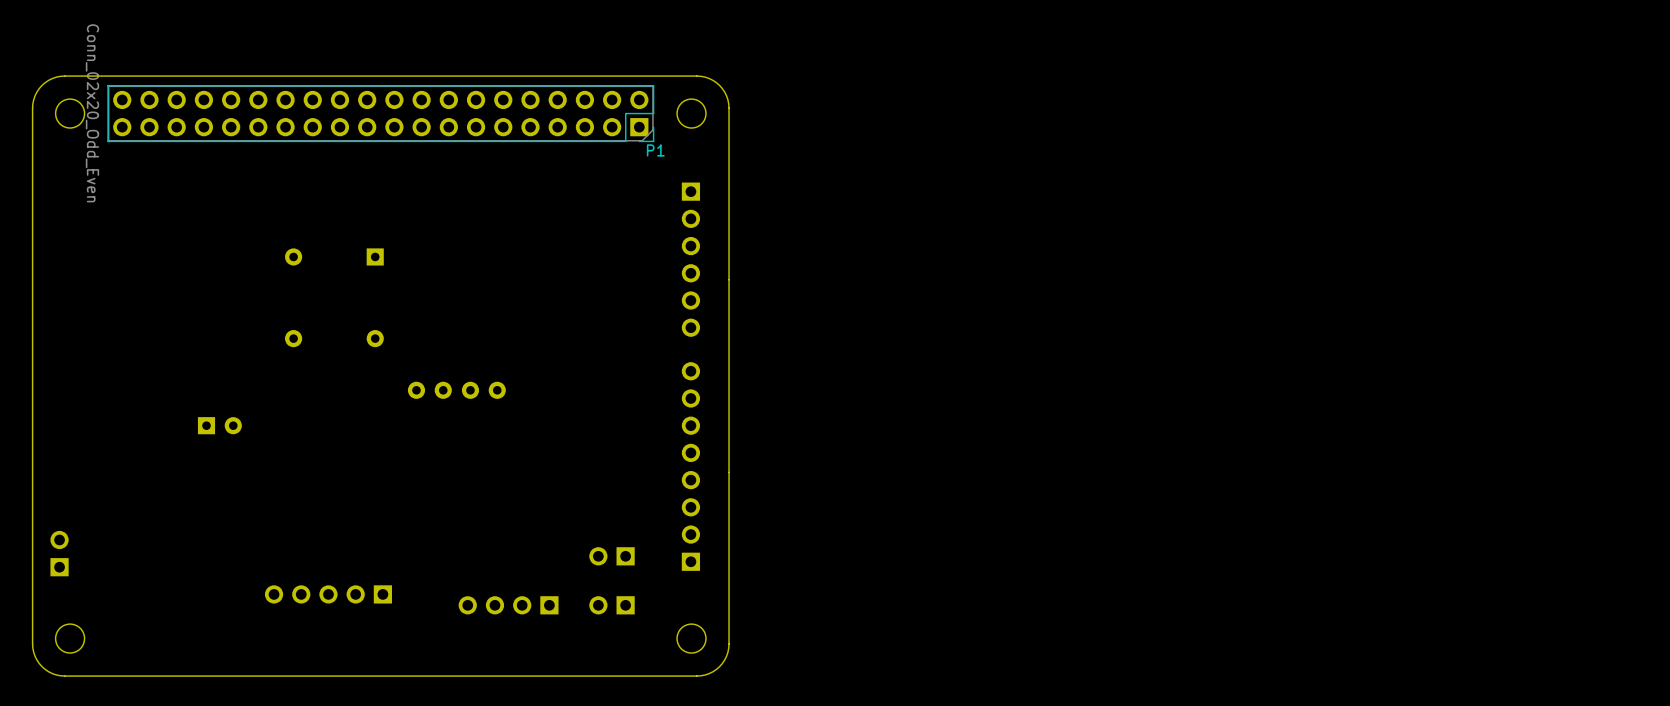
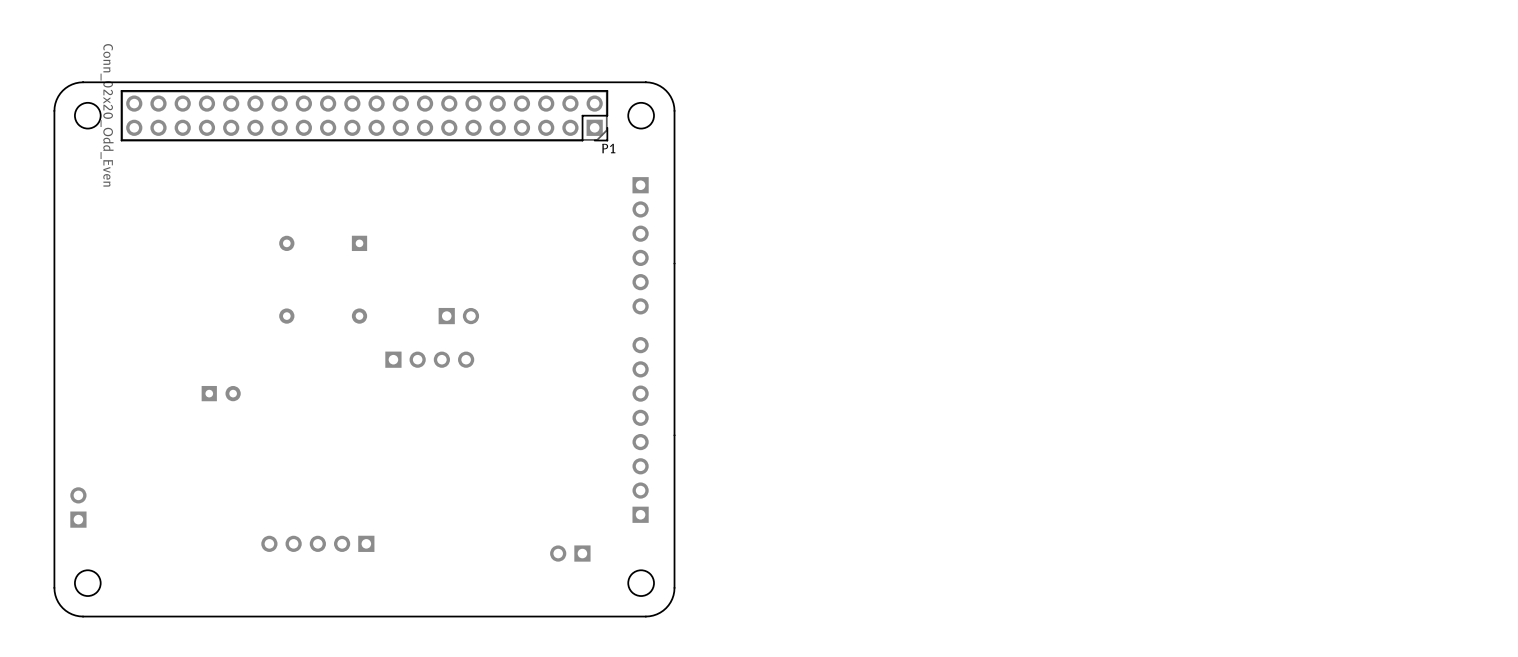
part: (429, 390) -> none
part: (483, 390) -> none
part rotation: 0° (612, 556) -> 180° (458, 316)
part position: (612, 556) -> (458, 316)
part rotation: 0° (508, 605) -> 180° (429, 359)
part position: (508, 605) -> (429, 359)

